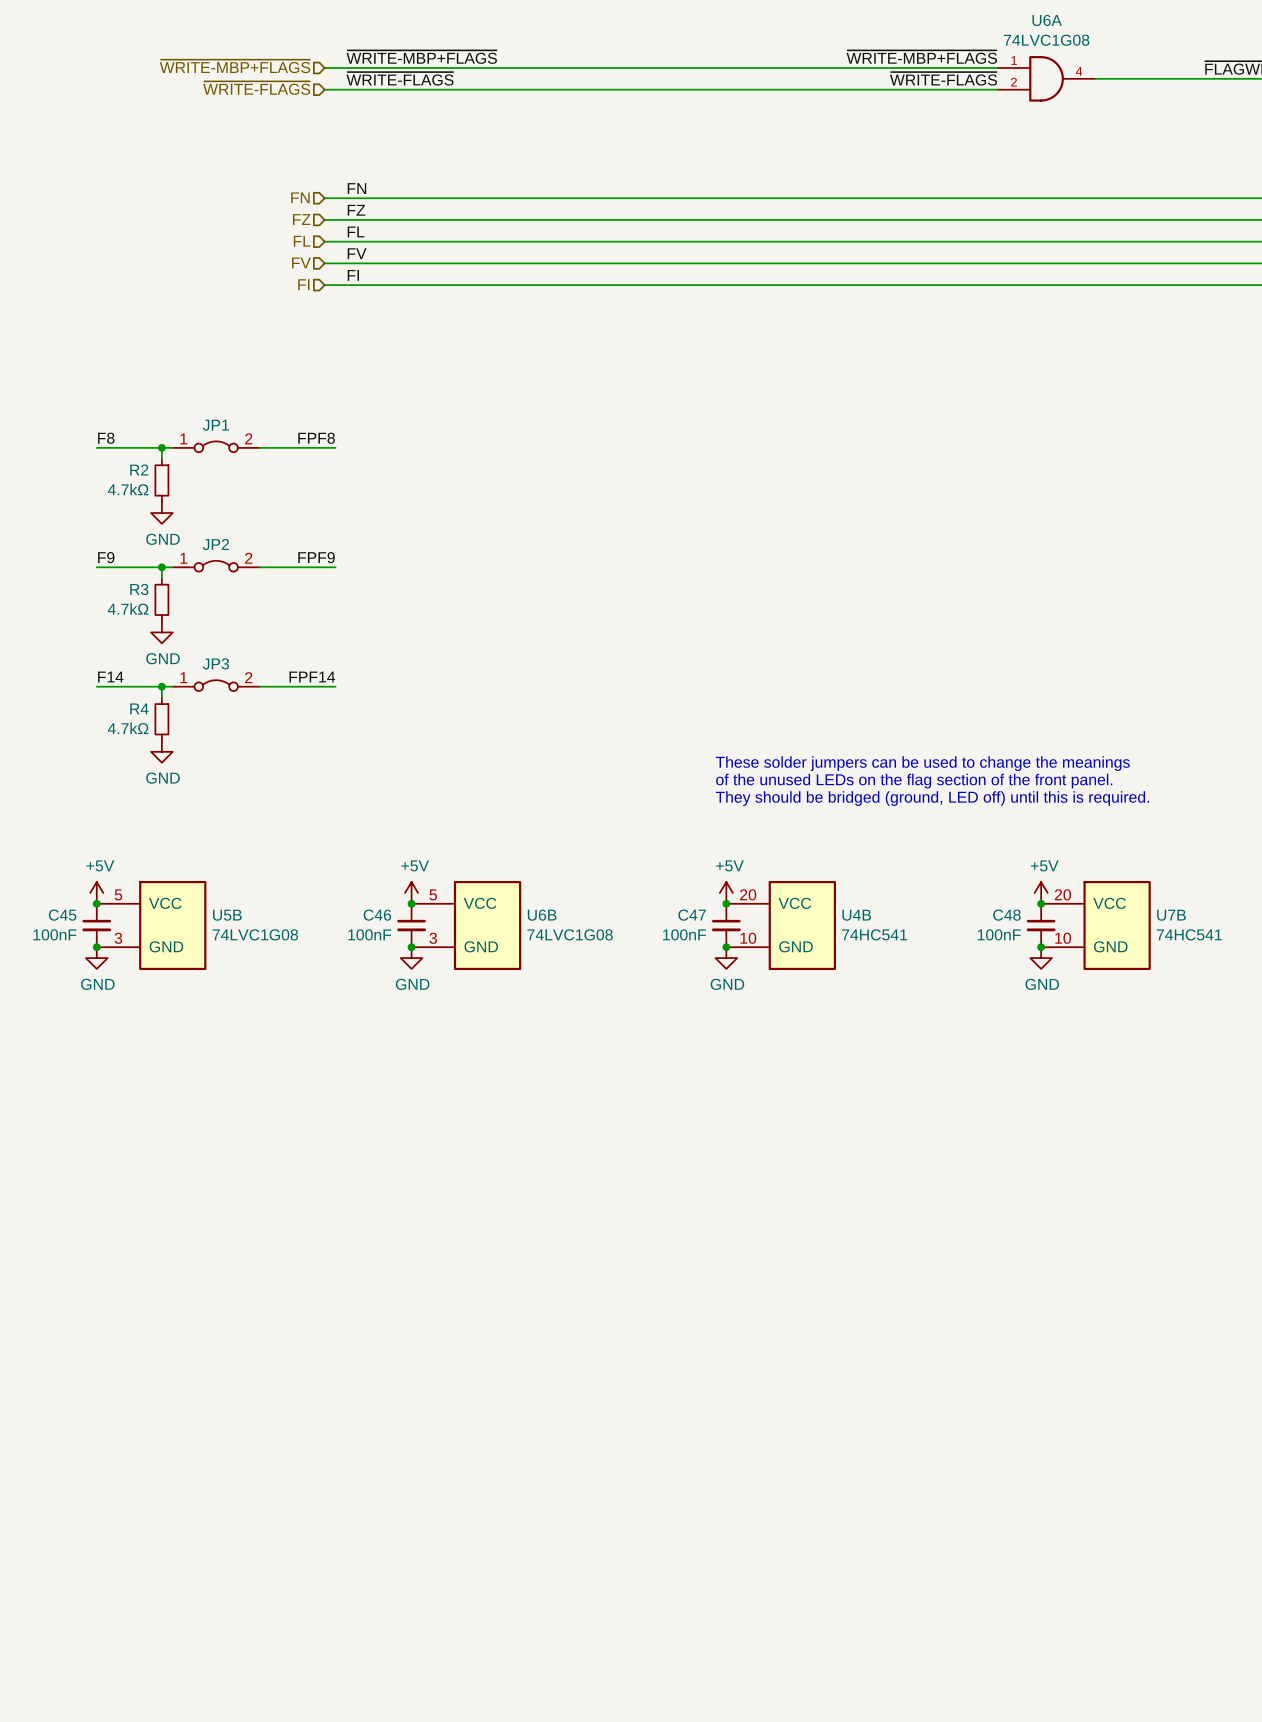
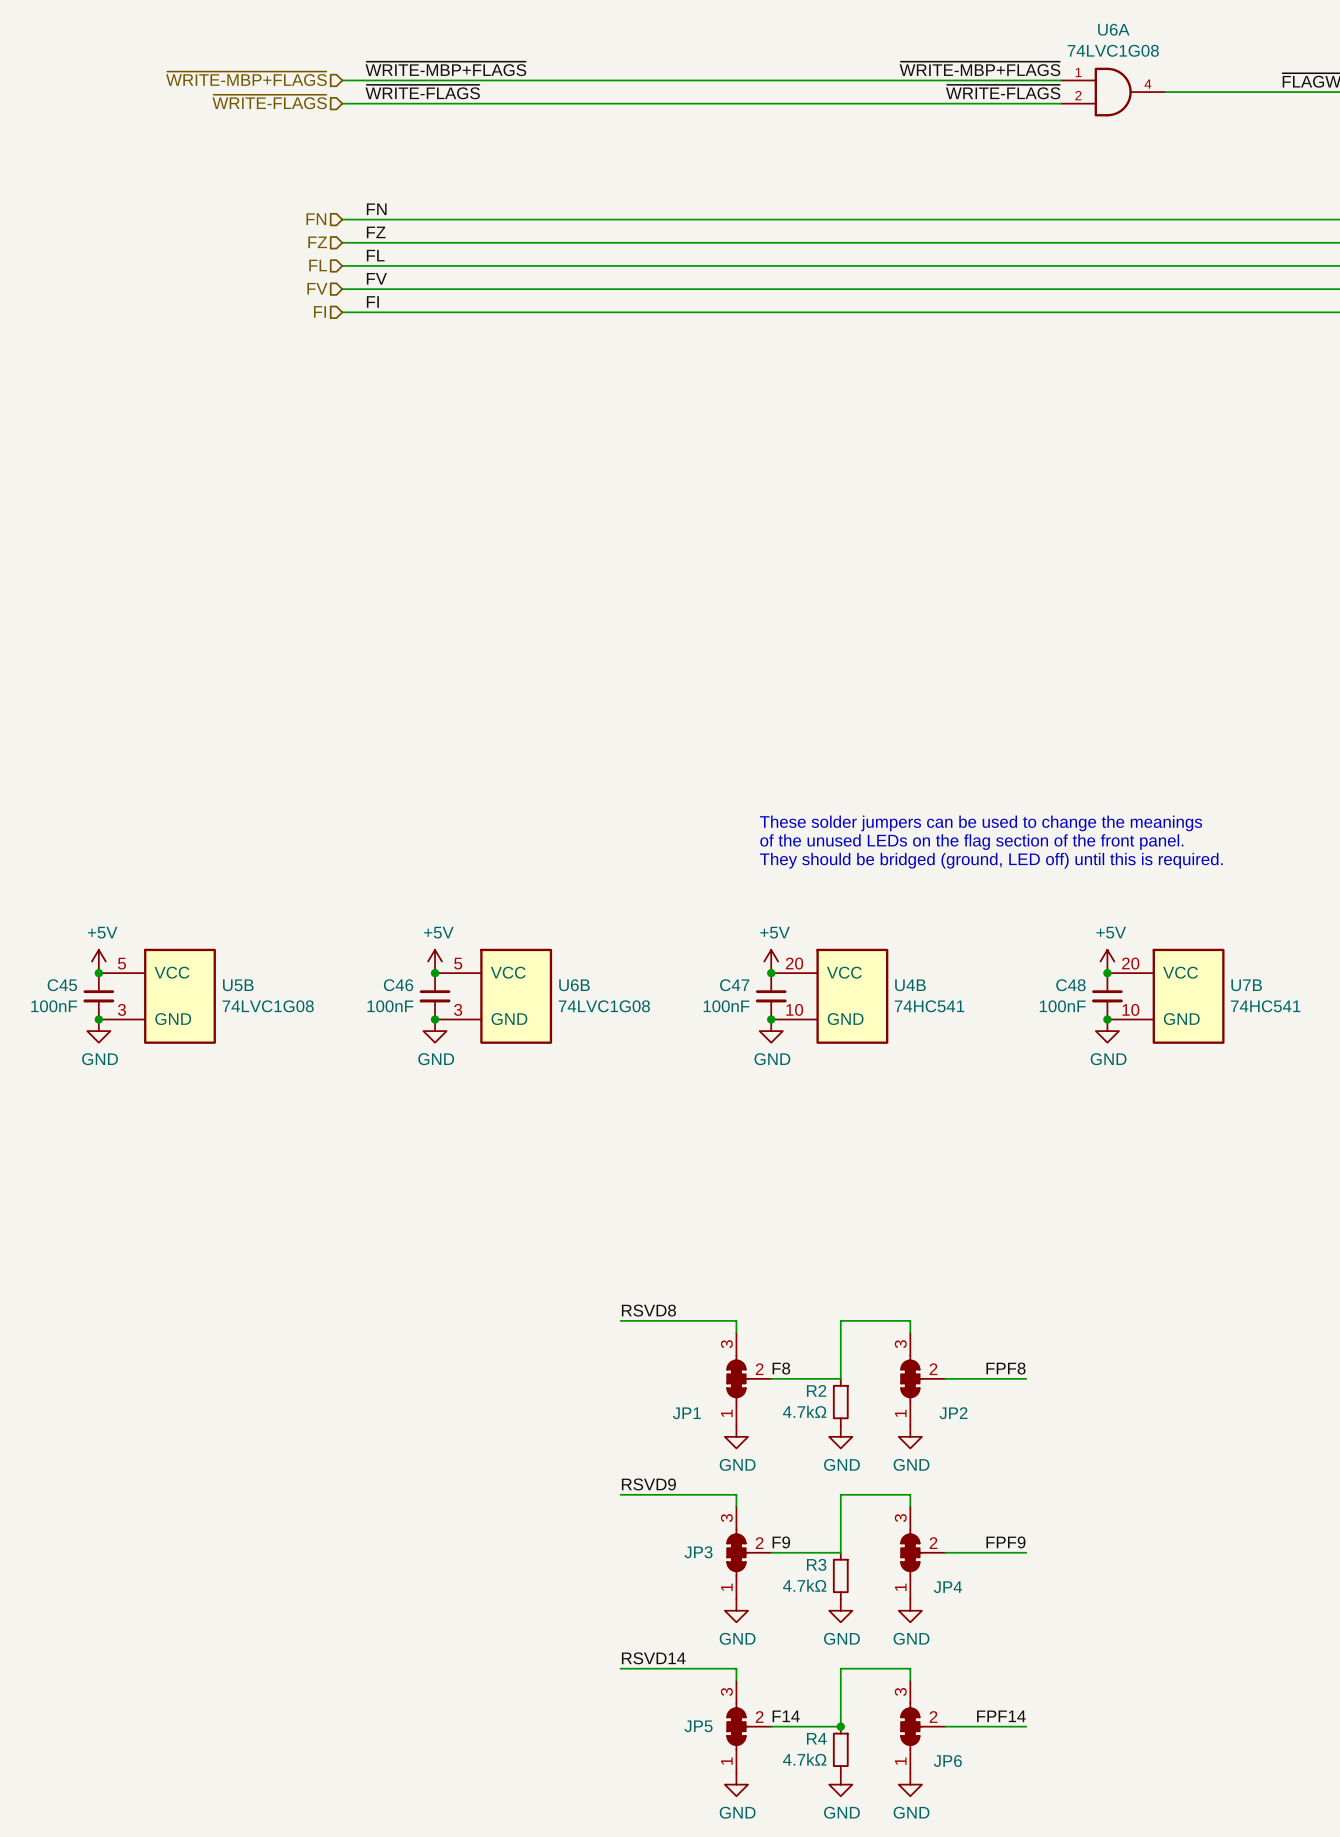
JP1 name position: JP1 (215, 425) -> JP1 (686, 1413)
label: F8 (106, 438) -> none
label: FPF8 (316, 438) -> none
JP1 symbol: [172, 441, 260, 453] -> [727, 1332, 772, 1426]
wire: (96, 447) (172, 447) -> none
wire: (161, 447) (161, 458) -> none
junction: (161, 447) -> none
wire: (259, 447) (335, 447) -> none
R2 position: (161, 480) -> (840, 1402)
power symbol: GND (161, 513) -> none
JP2 name position: JP2 (215, 544) -> JP2 (953, 1413)
label: F9 (106, 557) -> none
label: FPF9 (316, 557) -> none
JP2 symbol: [172, 560, 260, 572] -> [901, 1332, 946, 1426]
wire: (96, 567) (172, 567) -> none
wire: (161, 567) (161, 578) -> none
junction: (161, 567) -> none
wire: (259, 567) (335, 567) -> none
R3 position: (161, 599) -> (840, 1575)
power symbol: GND (161, 632) -> none
JP3 name position: JP3 (215, 663) -> JP3 (698, 1552)
label: F14 (110, 677) -> none
label: FPF14 (312, 677) -> none
JP3 symbol: [172, 680, 260, 692] -> [727, 1506, 772, 1600]
wire: (96, 686) (172, 686) -> none
wire: (161, 686) (161, 697) -> none
junction: (161, 686) -> none
wire: (259, 686) (335, 686) -> none
R4 position: (161, 719) -> (840, 1749)
power symbol: GND (161, 751) -> none
label: none -> RSVD8 (648, 1310)
wire: none -> (620, 1320) (736, 1320) (736, 1332)
wire: none -> (910, 1332) (910, 1320) (840, 1320) (840, 1378) (771, 1378)
label: none -> F8 (781, 1368)
label: none -> FPF8 (1005, 1368)
wire: none -> (945, 1378) (1026, 1378)
power symbol: none -> GND (736, 1436)
power symbol: none -> GND (840, 1436)
power symbol: none -> GND (910, 1436)
label: none -> RSVD9 (648, 1484)
wire: none -> (620, 1494) (736, 1494) (736, 1506)
wire: none -> (910, 1506) (910, 1494) (840, 1494) (840, 1552) (771, 1552)
label: none -> F9 (781, 1542)
label: none -> FPF9 (1005, 1542)
JP4: none -> (923, 1552)
wire: none -> (945, 1552) (1026, 1552)
power symbol: none -> GND (736, 1610)
power symbol: none -> GND (840, 1610)
power symbol: none -> GND (910, 1610)
label: none -> RSVD14 (653, 1658)
wire: none -> (620, 1668) (736, 1668) (736, 1680)
wire: none -> (910, 1680) (910, 1668) (840, 1668) (840, 1726) (771, 1726)
label: none -> F14 (786, 1716)
label: none -> FPF14 (1001, 1716)
JP5: none -> (749, 1726)
junction: none -> (840, 1726)
JP6: none -> (923, 1726)
wire: none -> (945, 1726) (1026, 1726)
power symbol: none -> GND (736, 1784)
power symbol: none -> GND (840, 1784)
power symbol: none -> GND (910, 1784)

